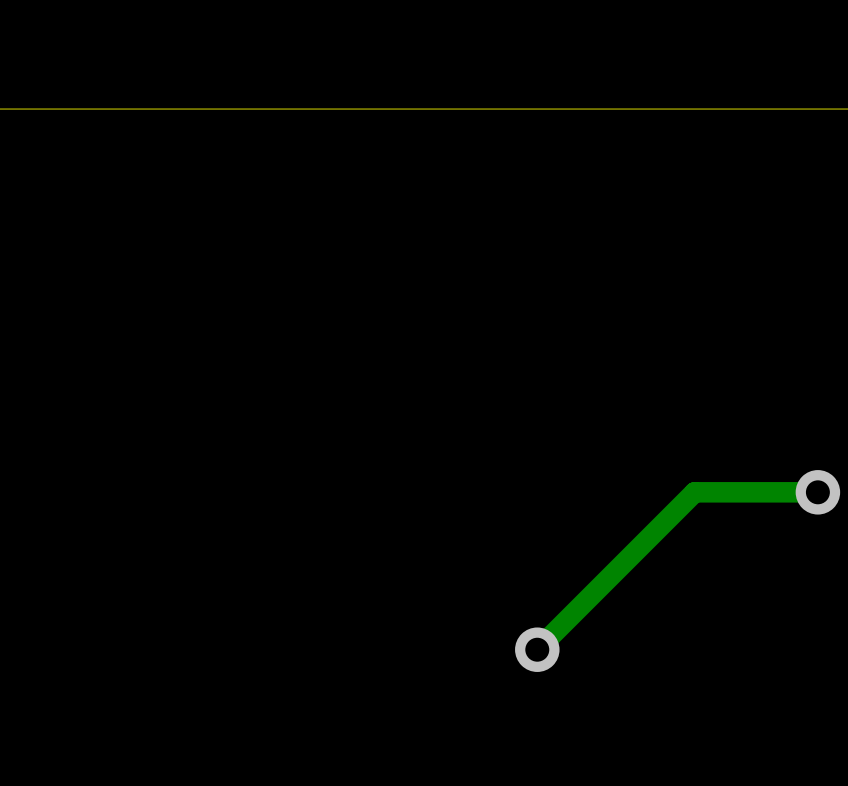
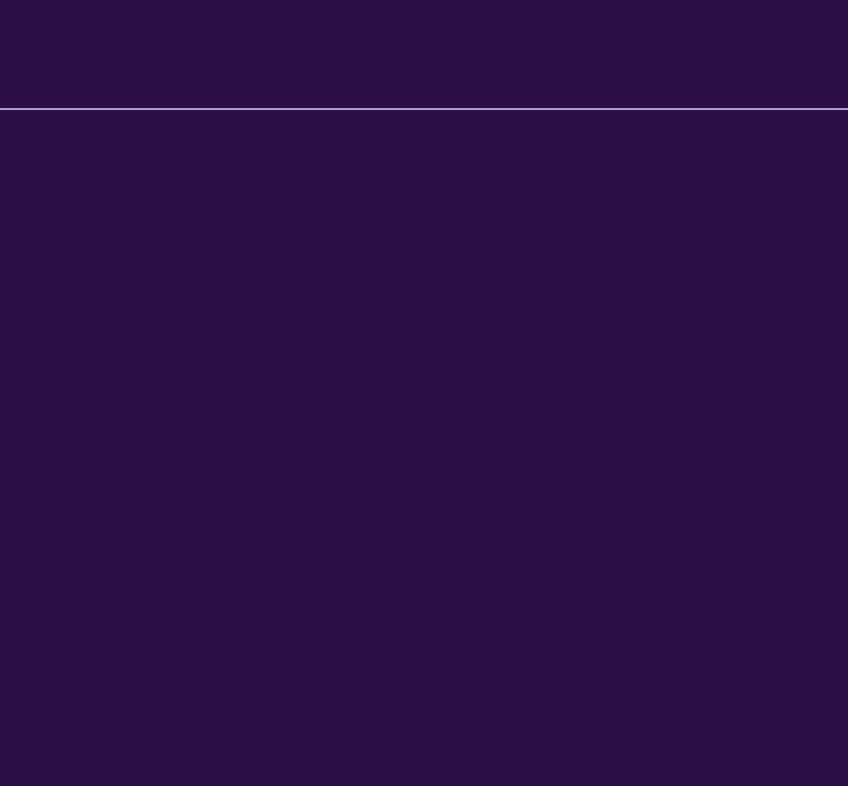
track: (817, 492) (694, 492) (537, 649) -> none
via: (817, 492) -> none
via: (537, 649) -> none

